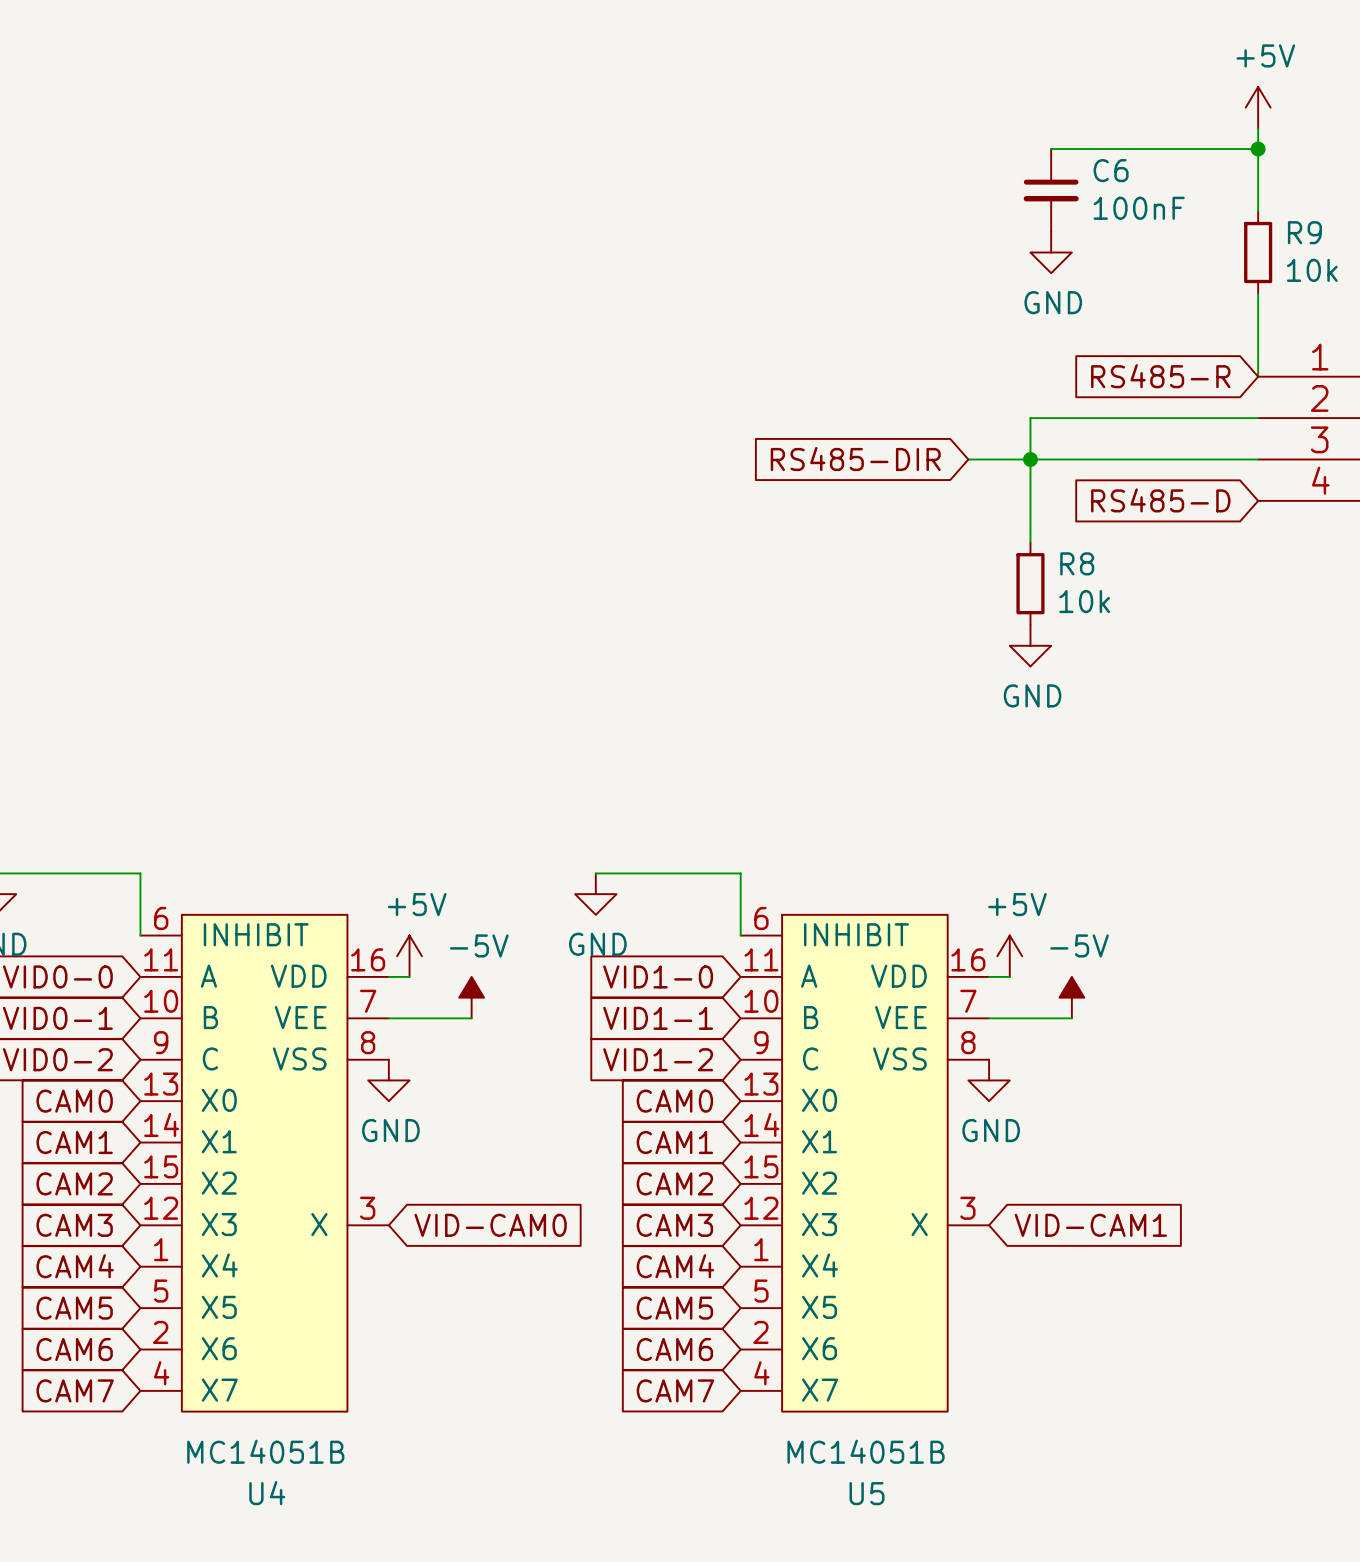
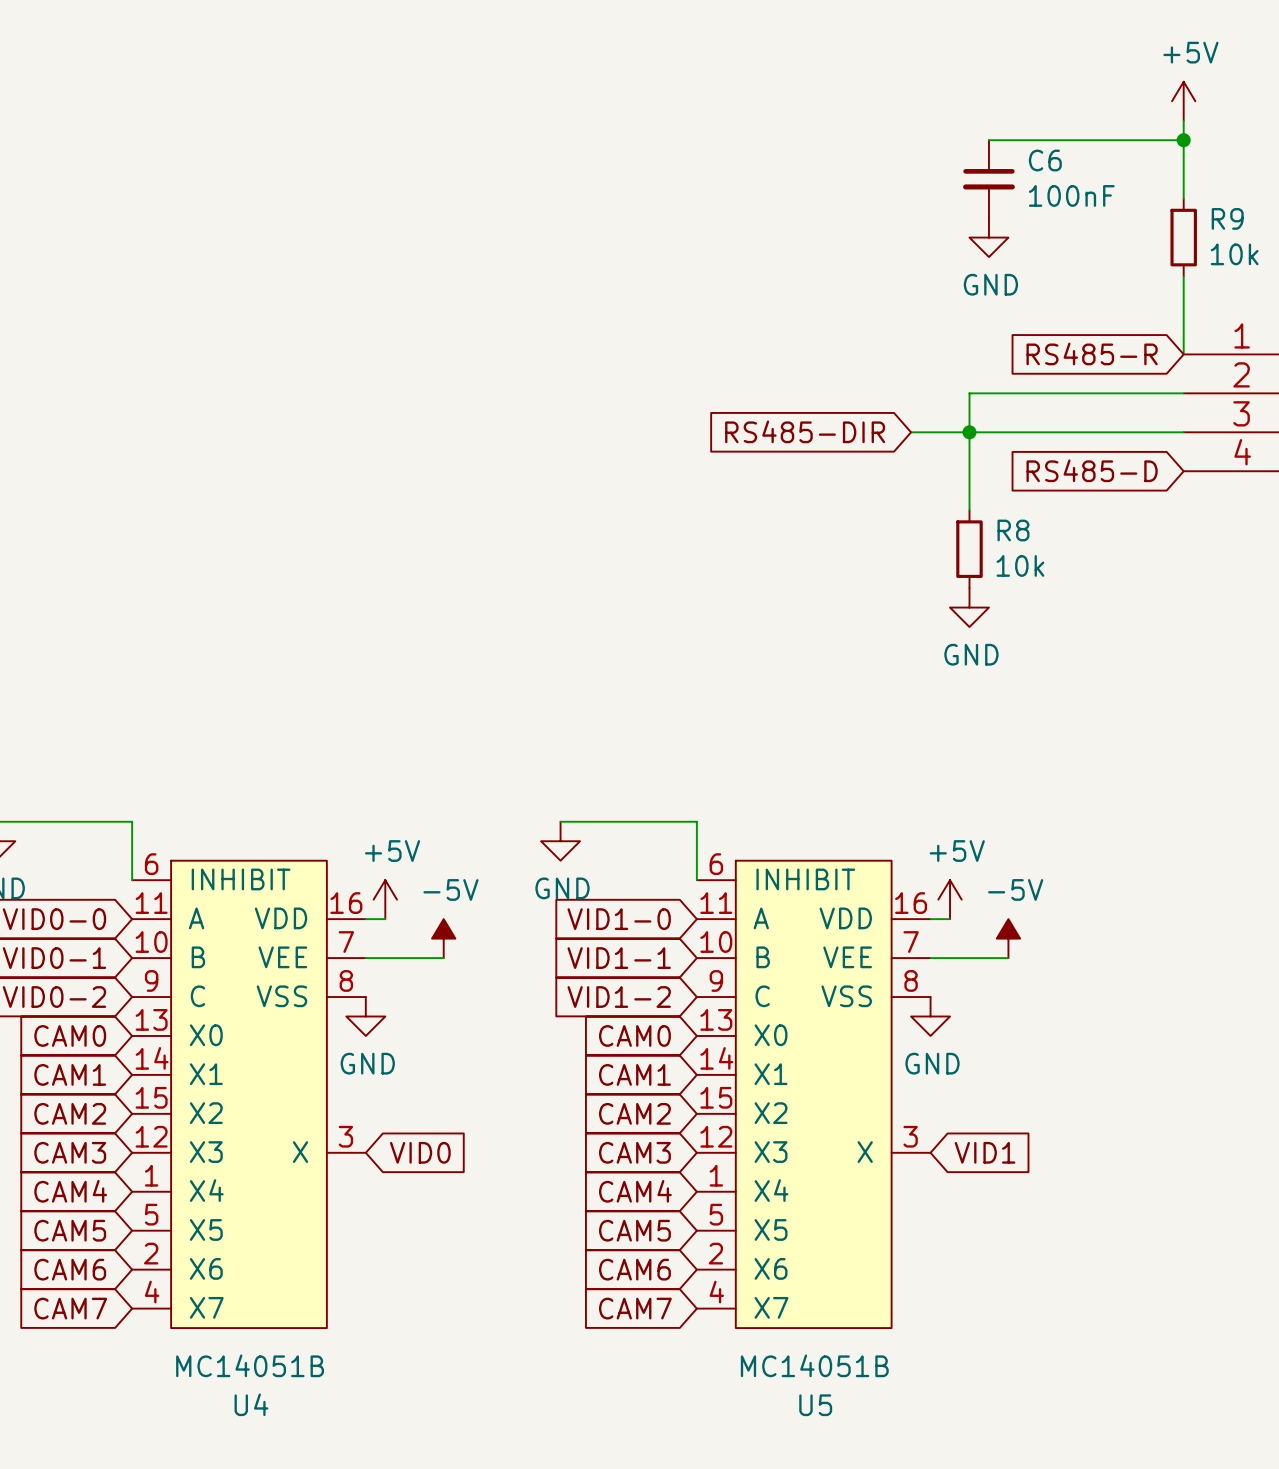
global label: VID-CAM0 (490, 1225) -> VID0 (420, 1152)
global label: VID-CAM1 (1090, 1225) -> VID1 (985, 1152)

